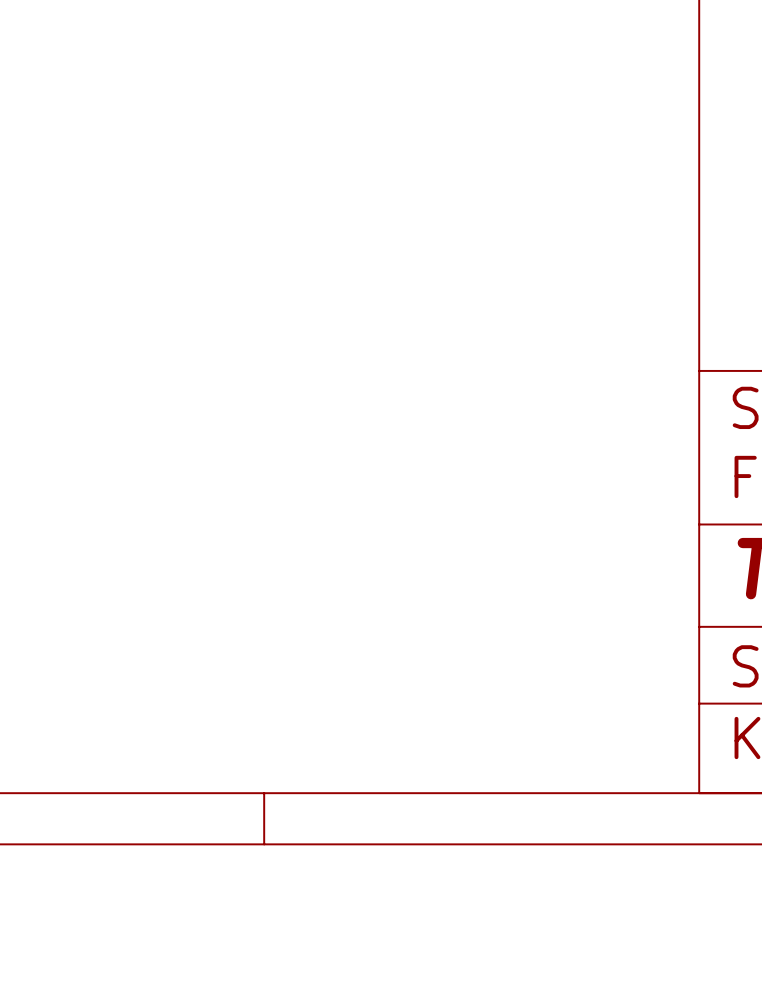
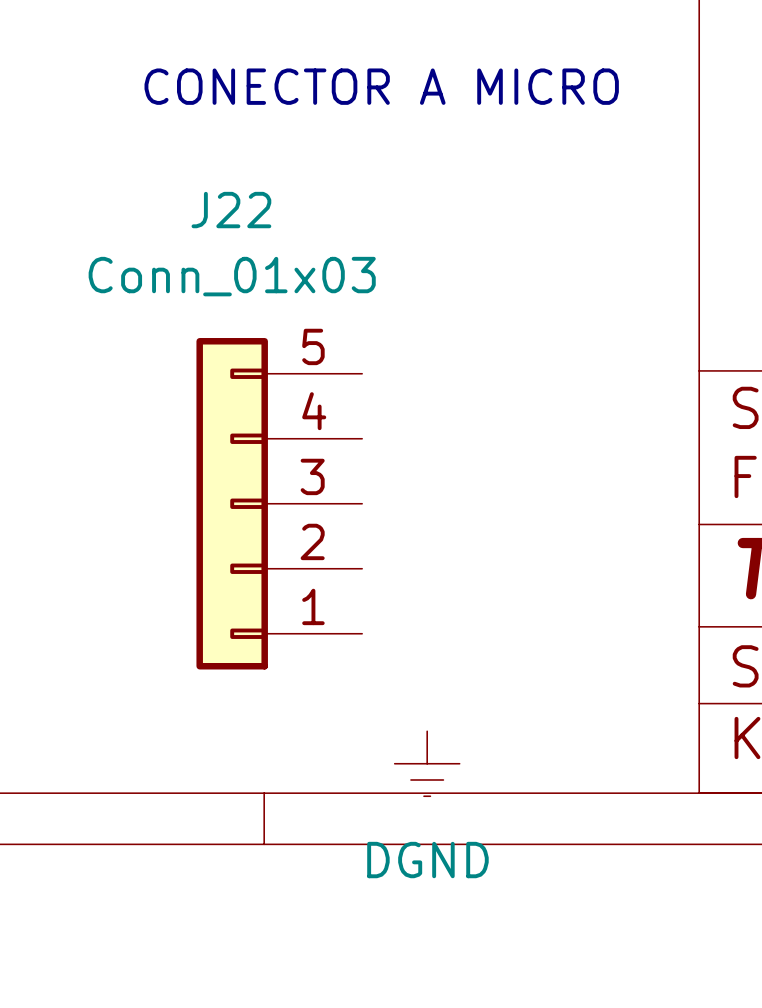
text: none -> CONECTOR A MICRO (381, 86)
J22: none -> Conn_01x03 (279, 503)
power symbol: none -> DGND (427, 763)

